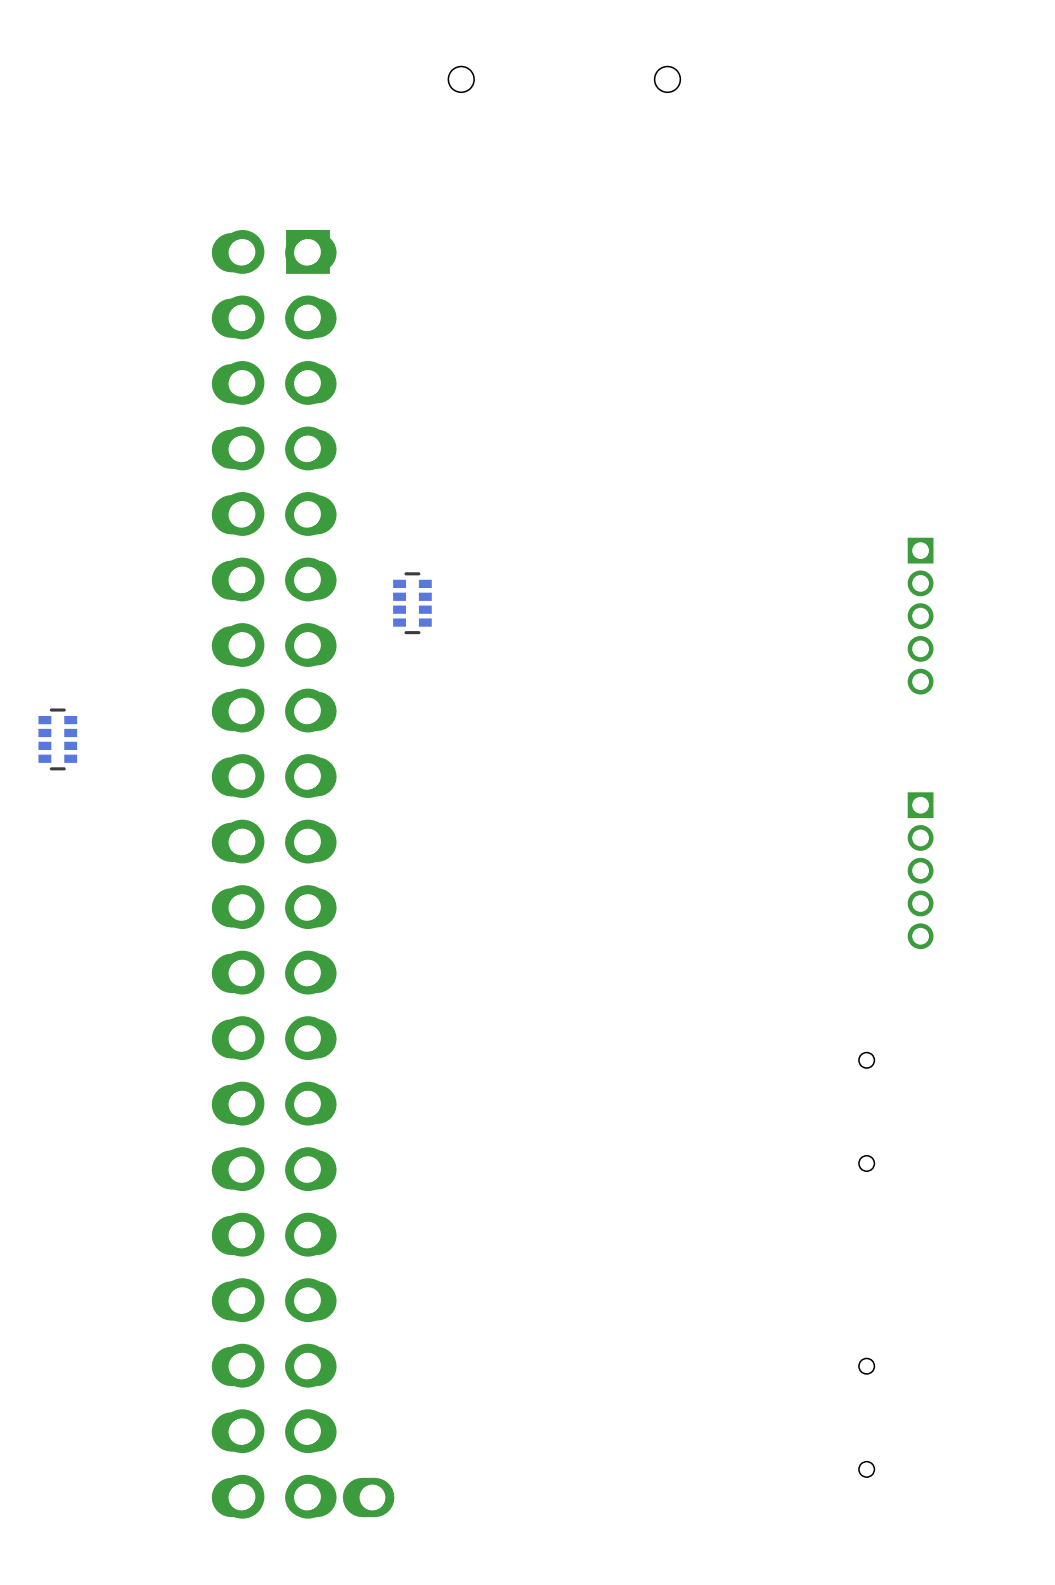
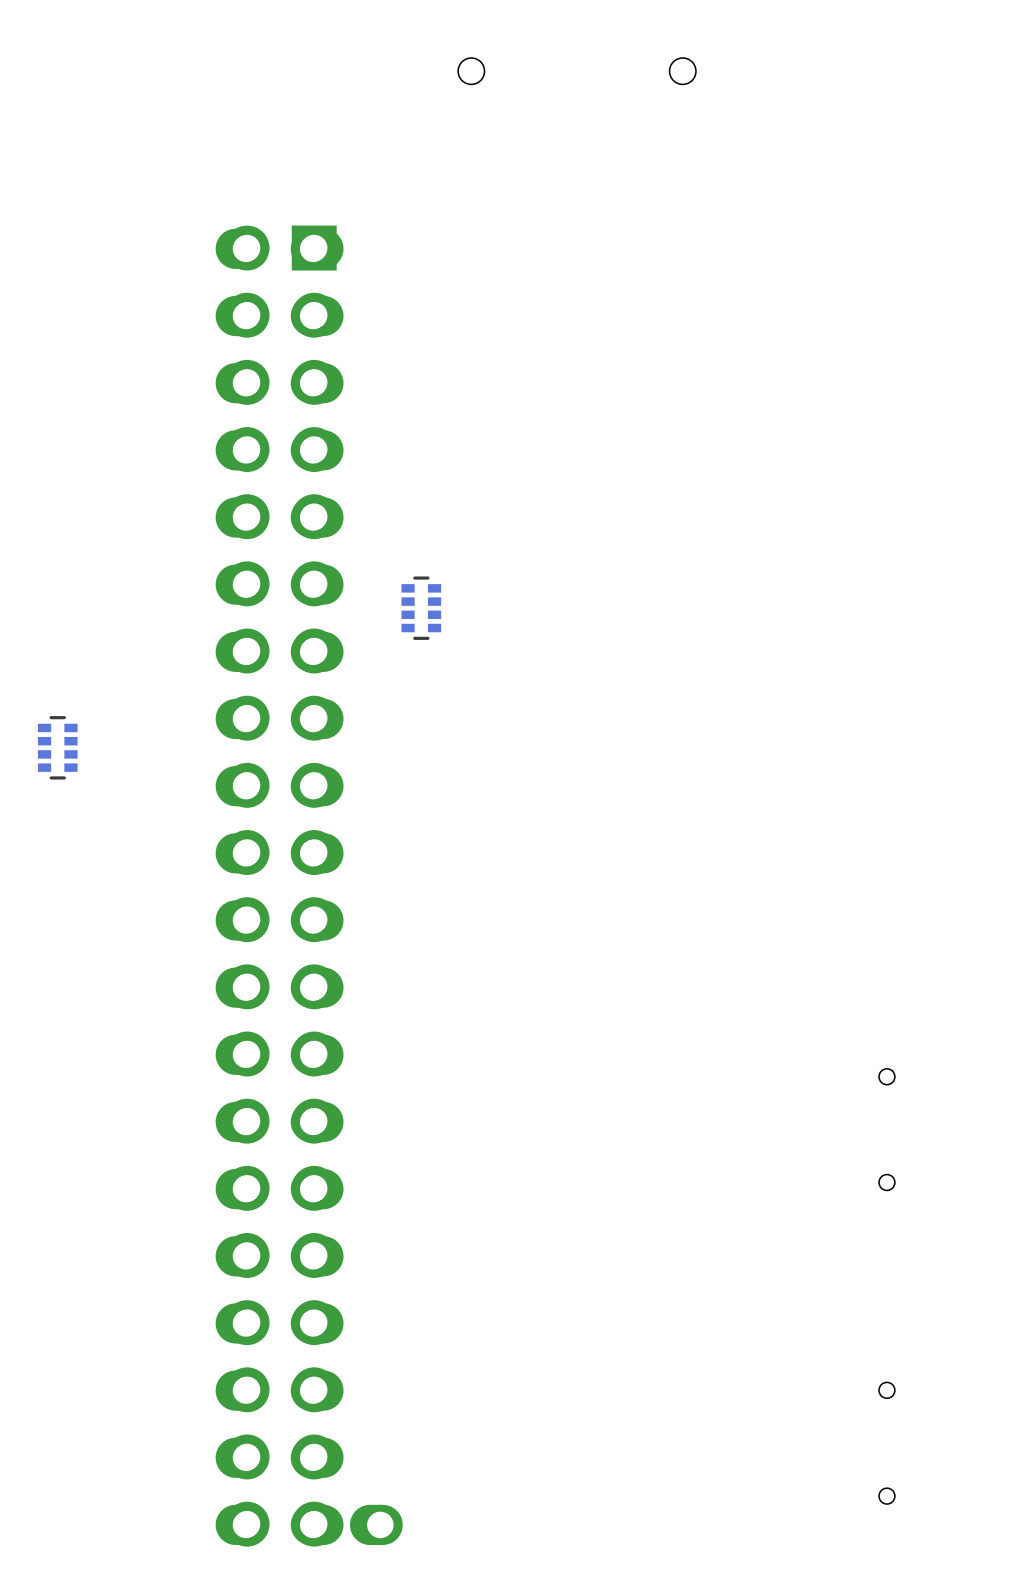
part: (920, 616) -> none
part: (920, 870) -> none

